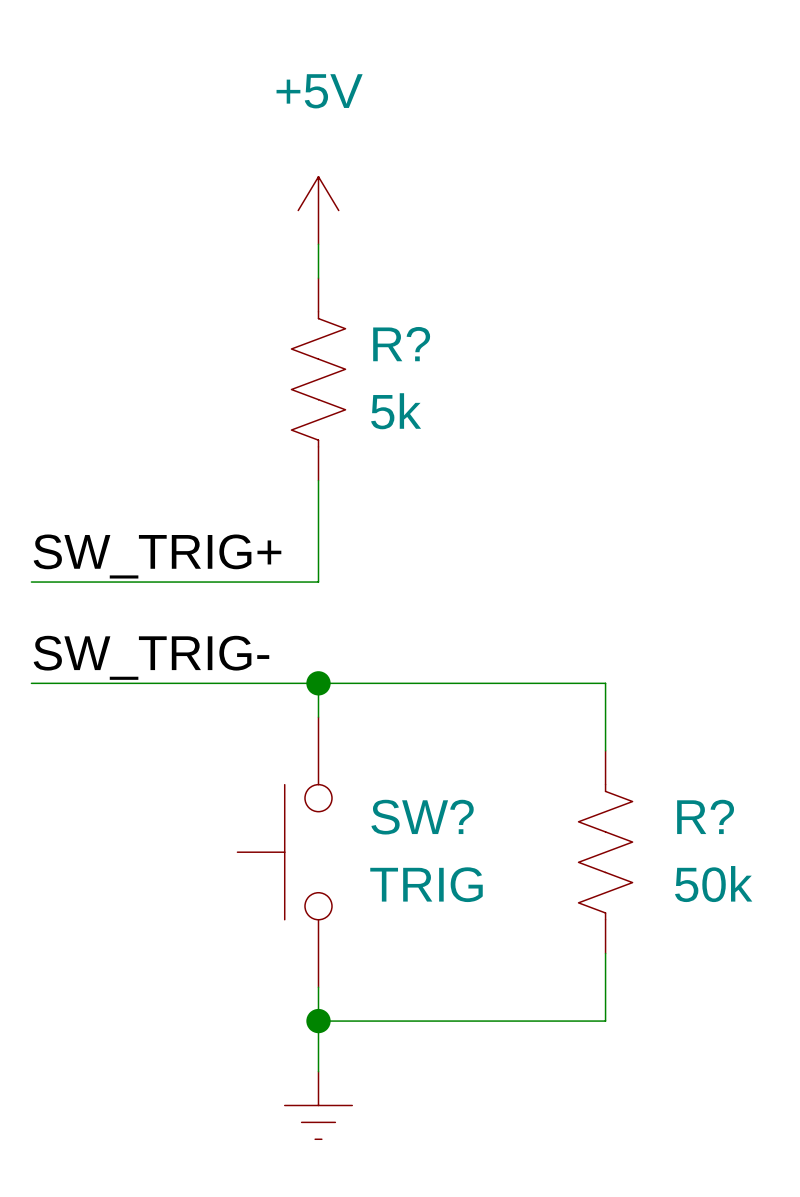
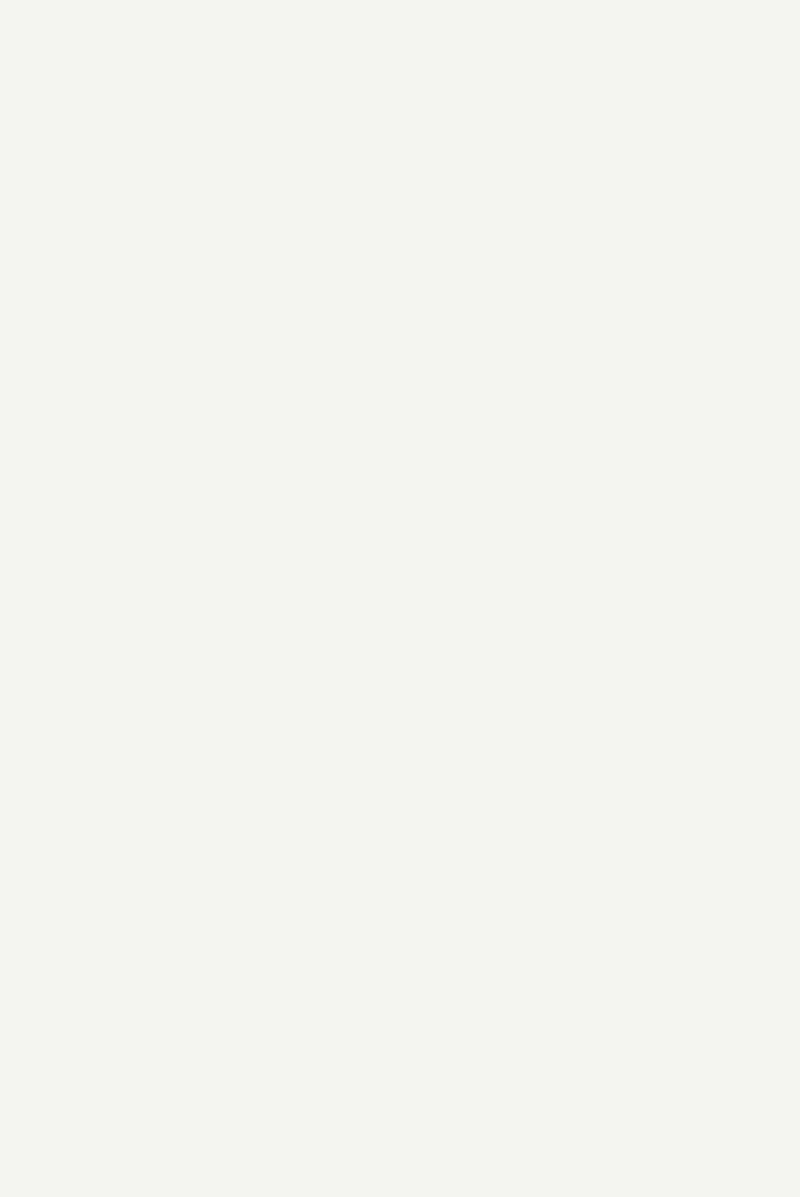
power symbol: +5V (318, 210) -> none
wire: (318, 244) (318, 278) -> none
R?: 5k (318, 379) -> none
wire: (318, 480) (318, 582) (31, 582) -> none
label: SW_TRIG+ (157, 556) -> none
label: SW_TRIG- (151, 657) -> none
wire: (31, 683) (605, 683) (605, 750) -> none
wire: (318, 683) (318, 717) -> none
junction: (318, 683) -> none
SW?: TRIG (284, 852) -> none
R?: 50k (605, 852) -> none
wire: (605, 953) (605, 1021) (318, 1021) -> none
wire: (318, 987) (318, 1071) -> none
junction: (318, 1021) -> none
power symbol: (318, 1105) -> none

